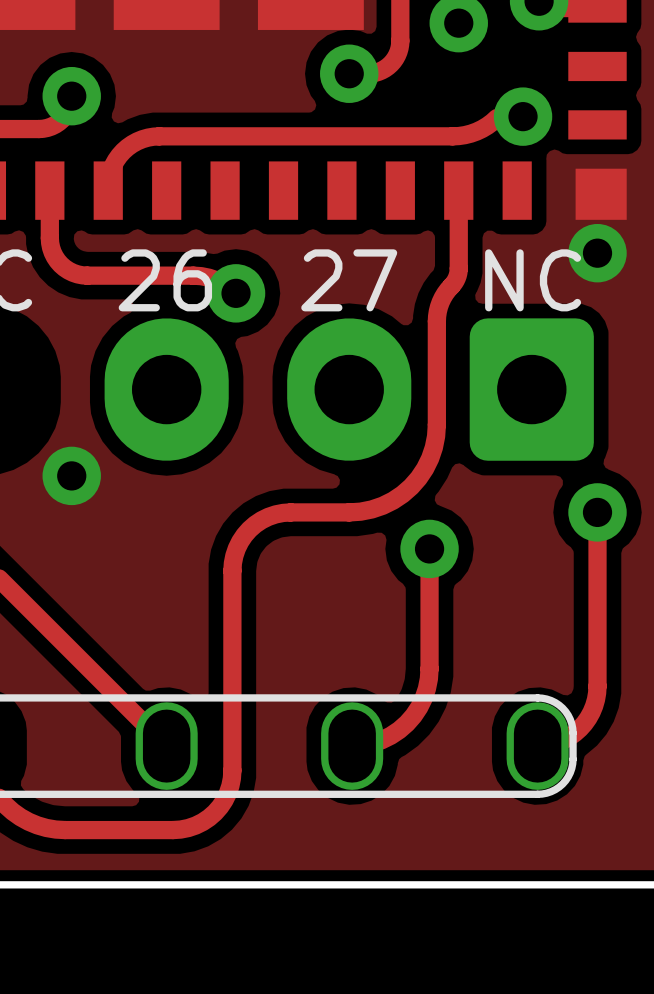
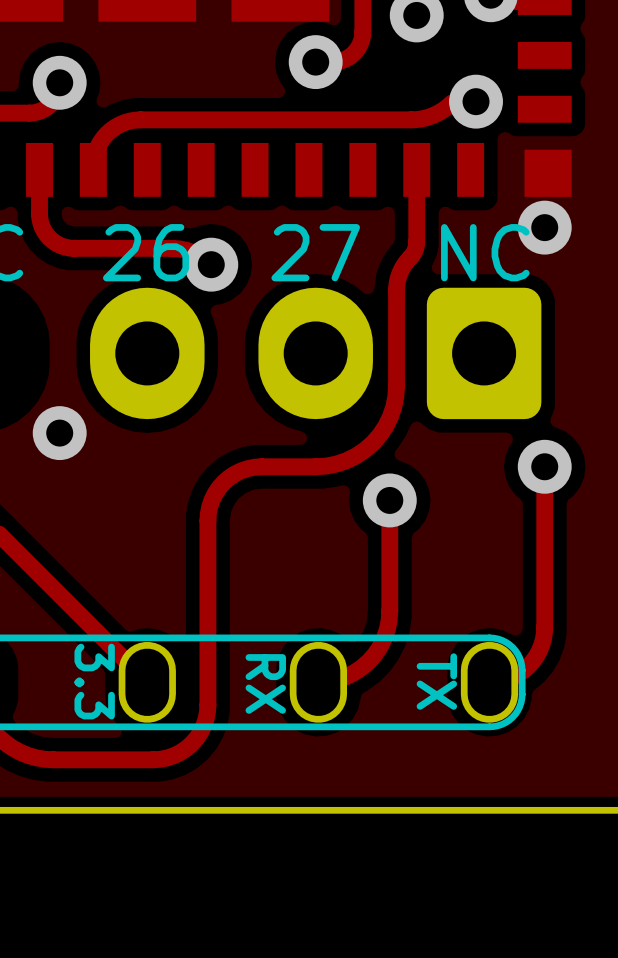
part text: none -> 3.3 (94, 681)
part text: none -> TX (436, 681)
part text: none -> RX (265, 683)

